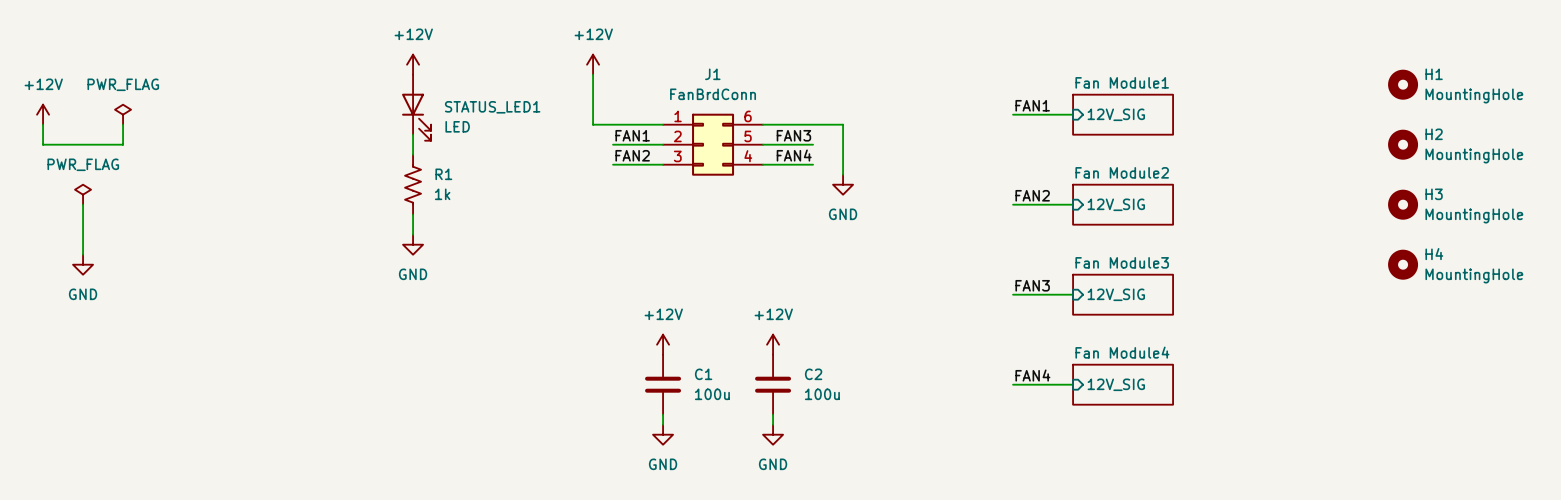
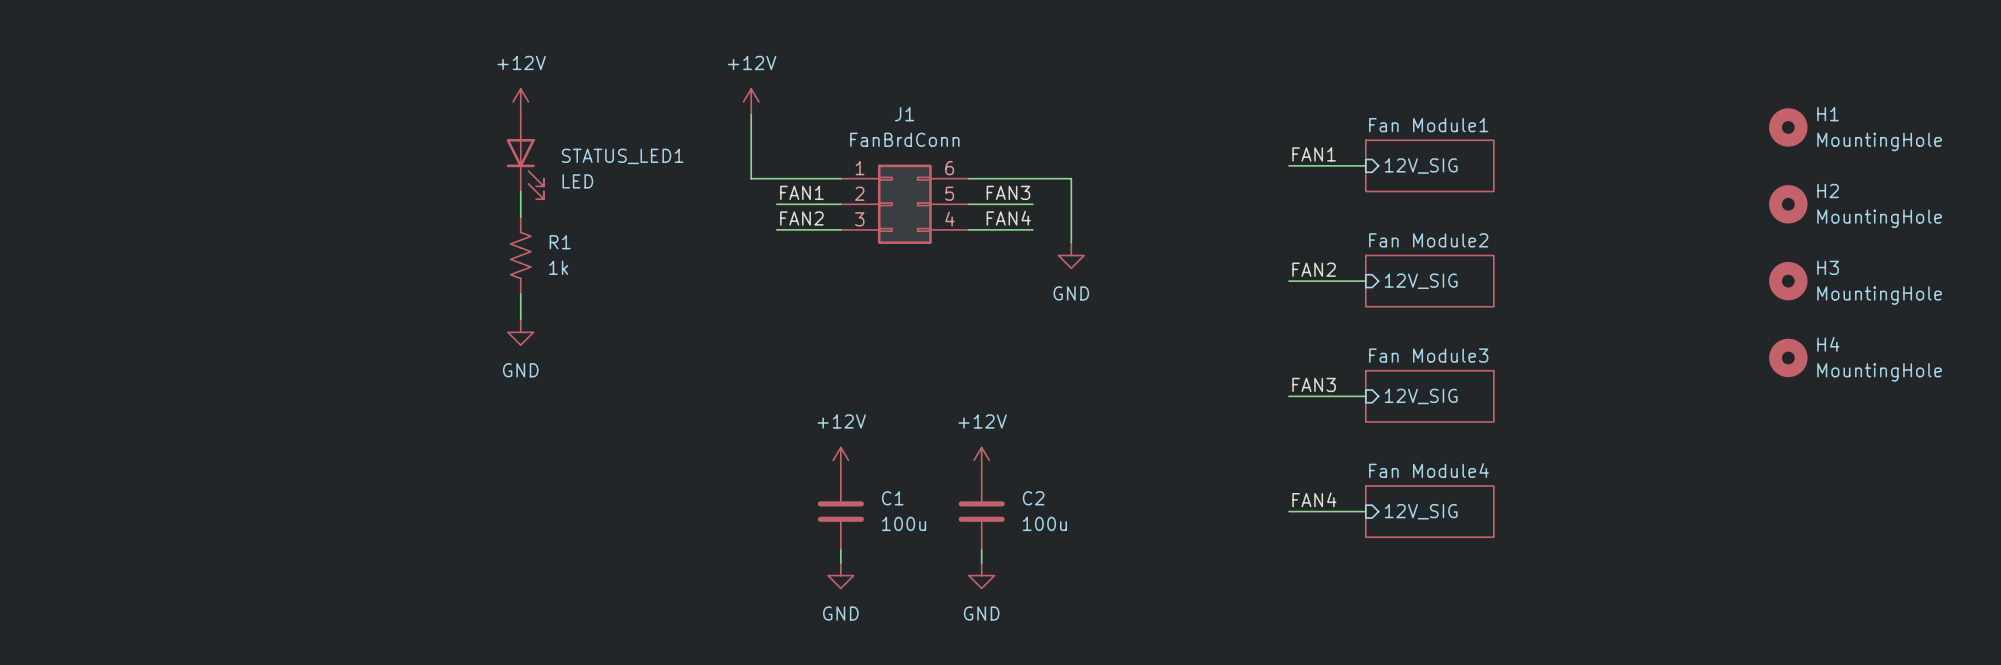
power symbol: +12V (43, 114) -> none
power symbol: PWR_FLAG (123, 114) -> none
wire: (43, 124) (43, 144) (123, 144) (123, 124) -> none
power symbol: PWR_FLAG (83, 194) -> none
wire: (83, 204) (83, 254) -> none
power symbol: GND (83, 264) -> none

